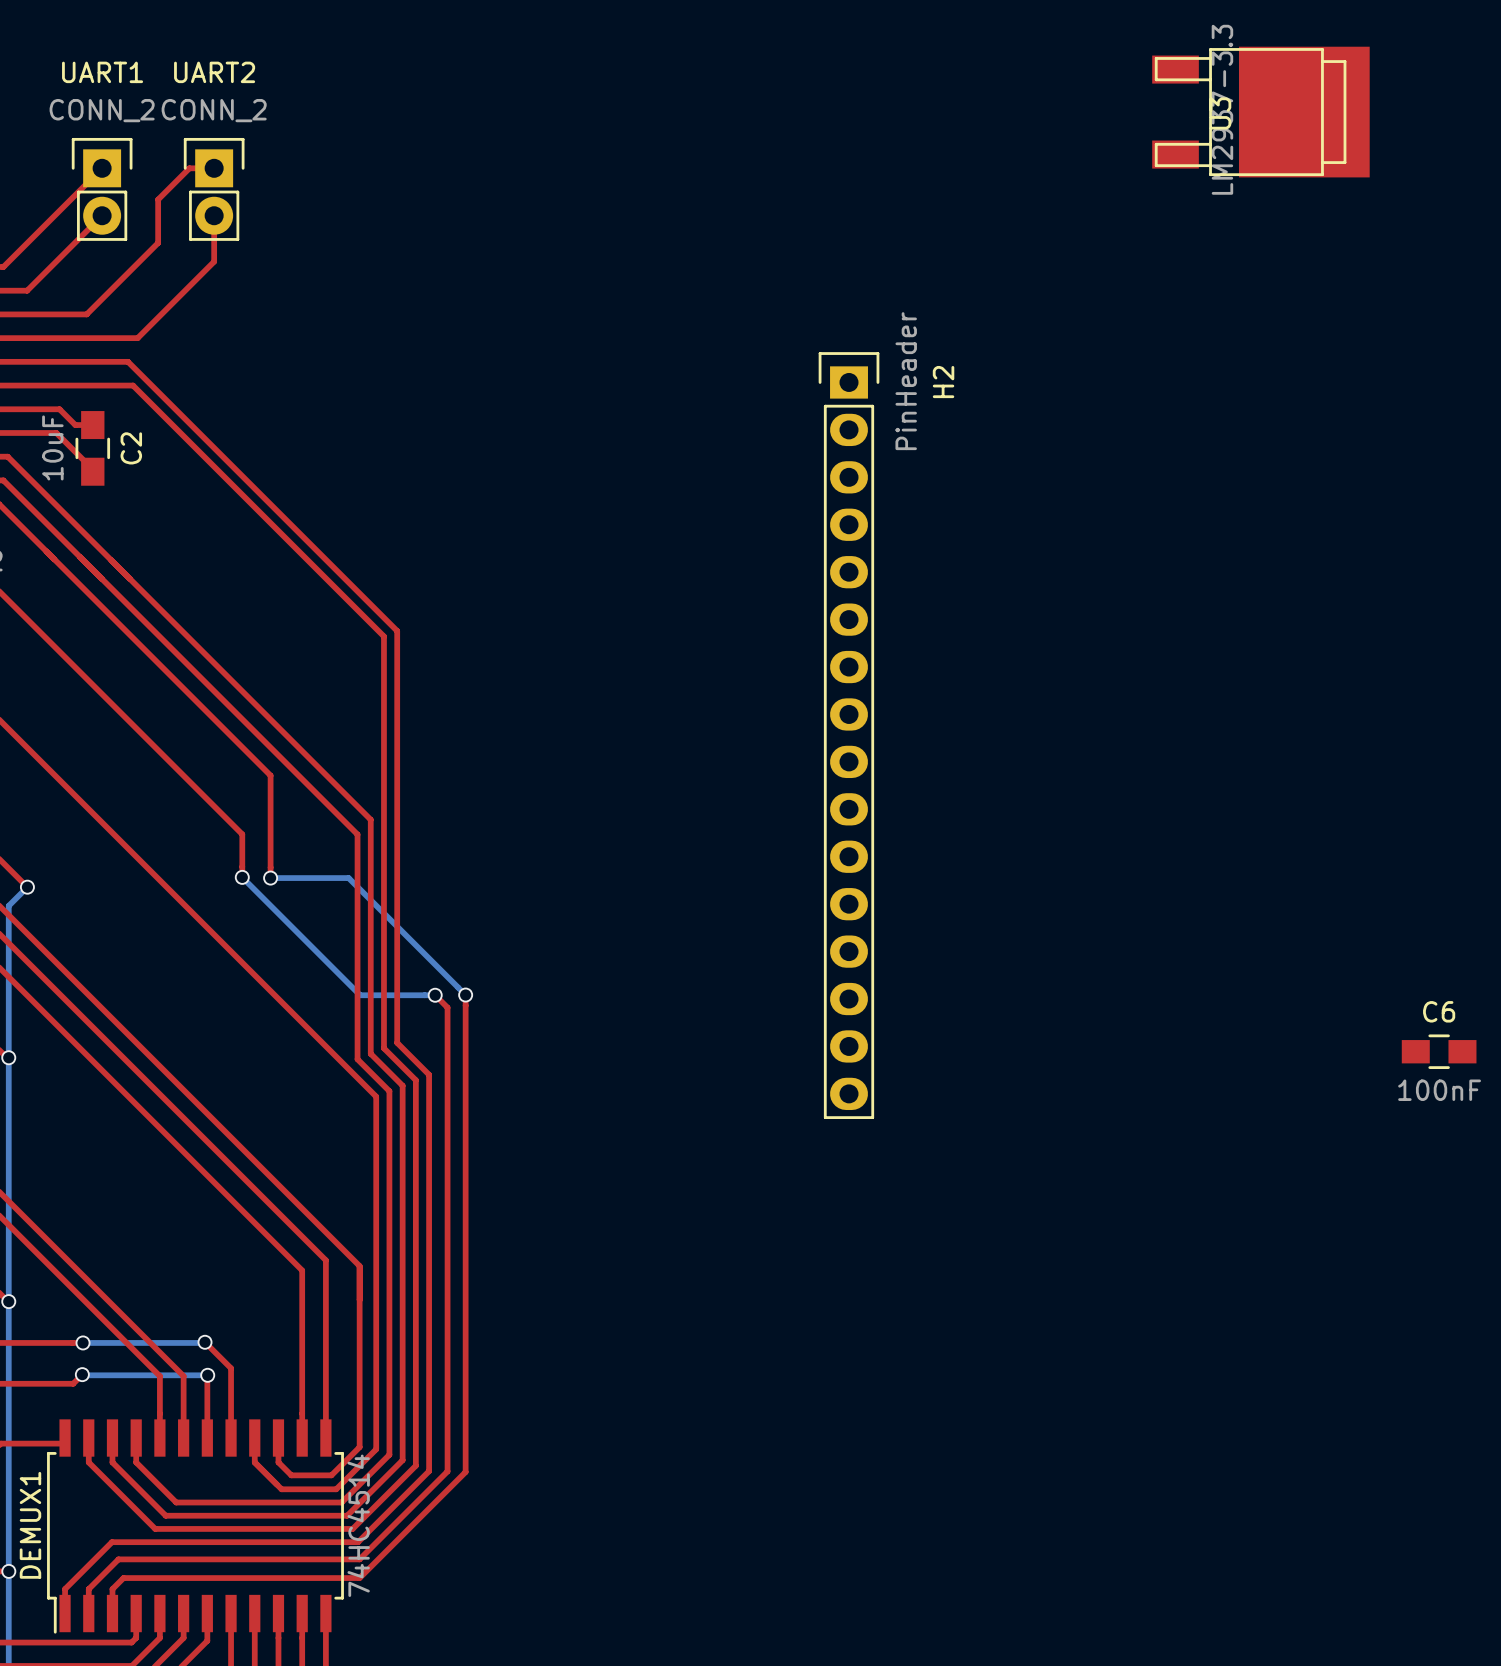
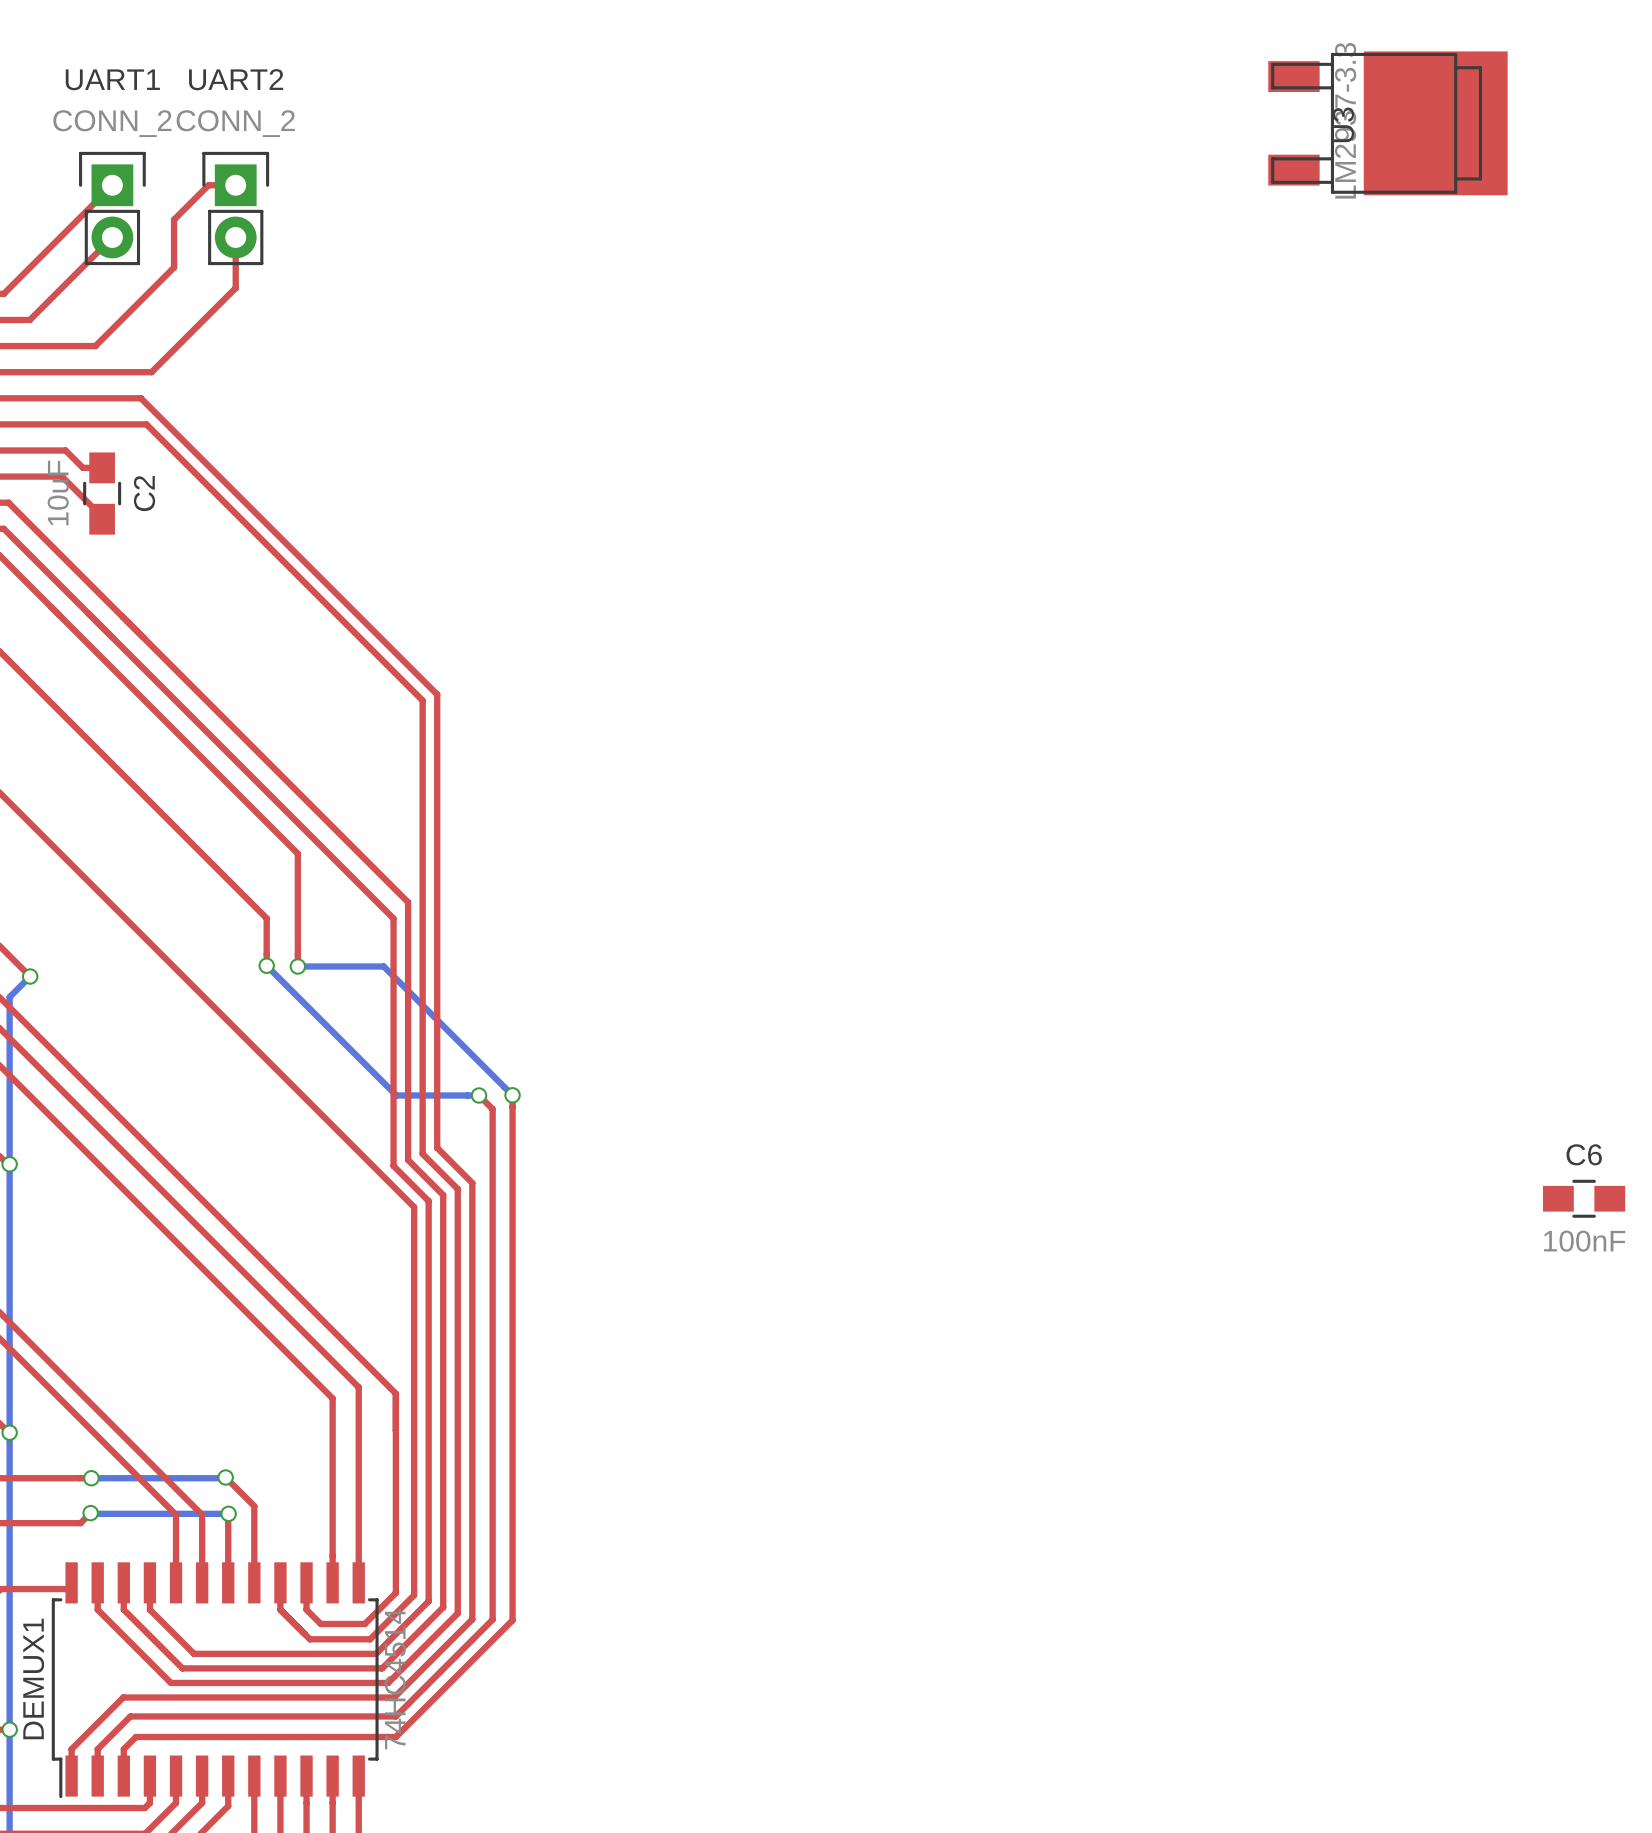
H2: PinHeader (849, 735) -> none
C6 position: (1439, 1051) -> (1584, 1198)

